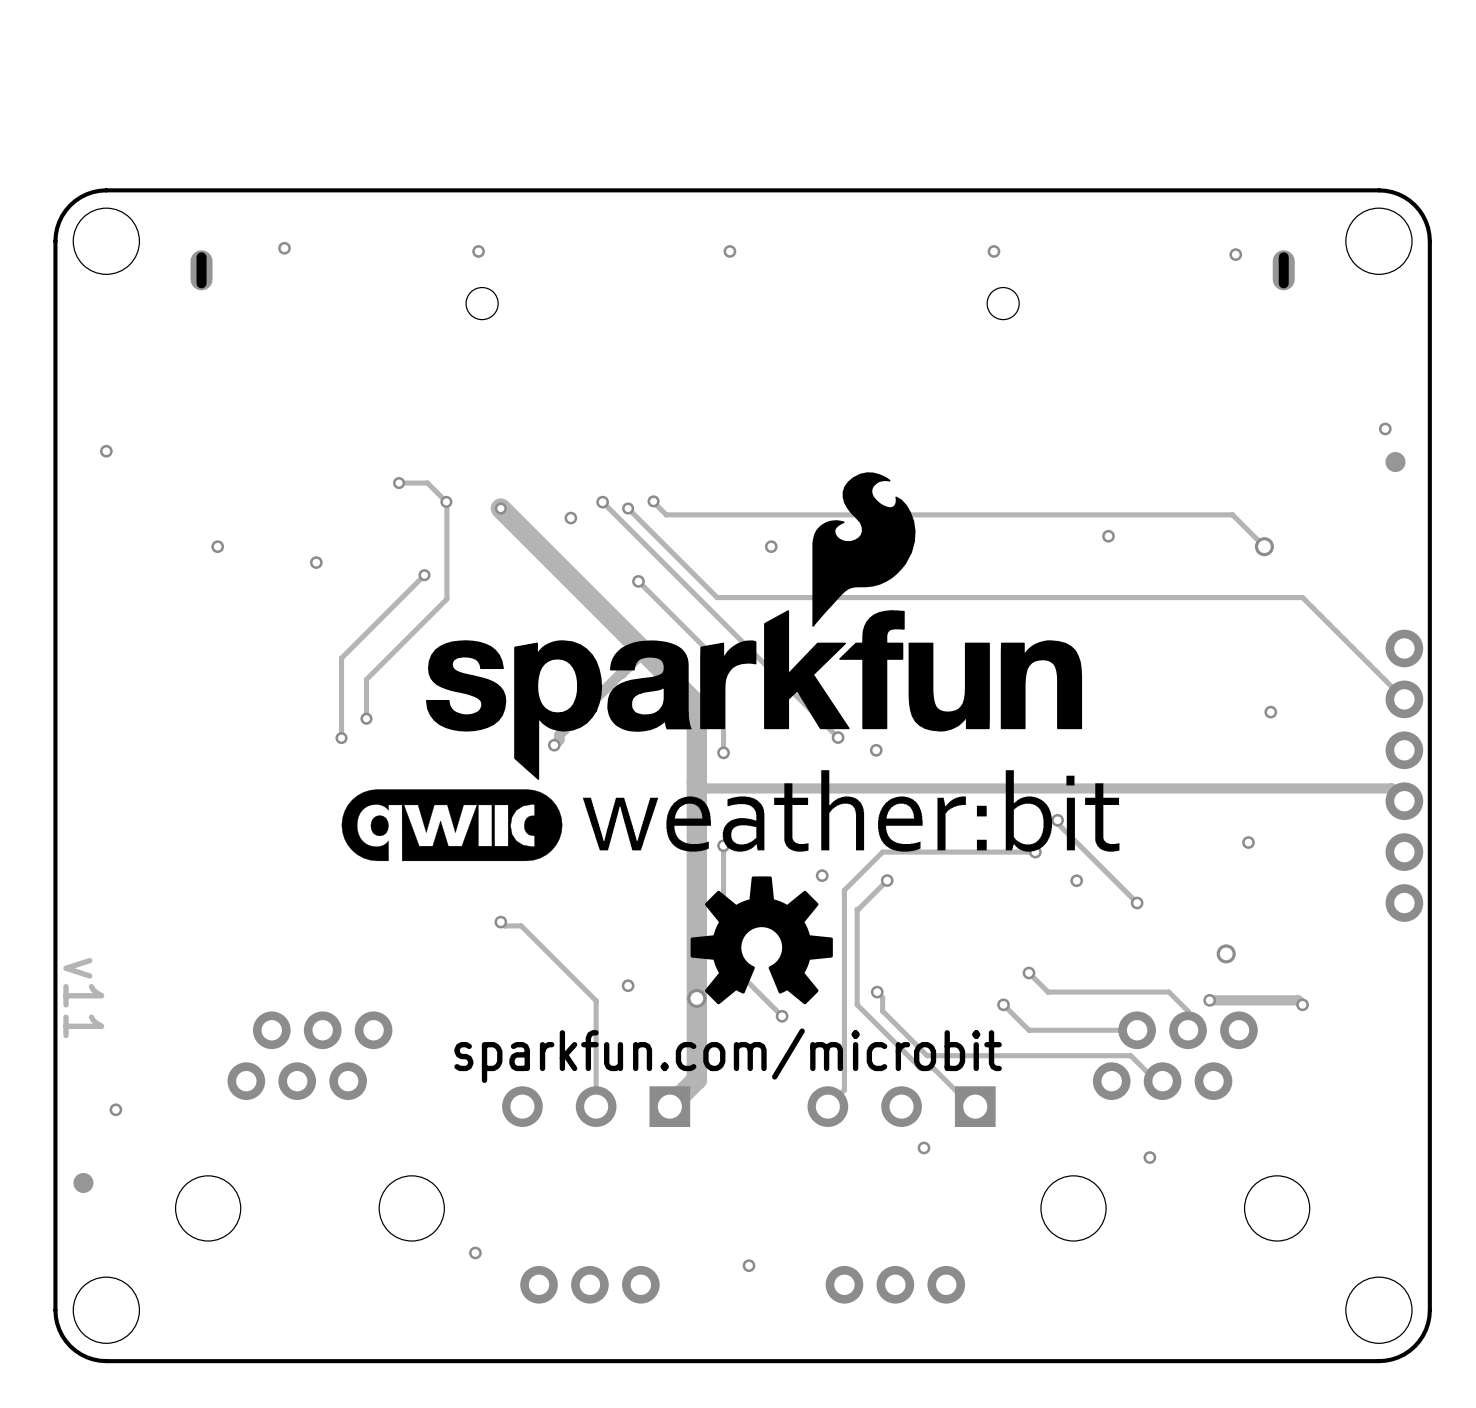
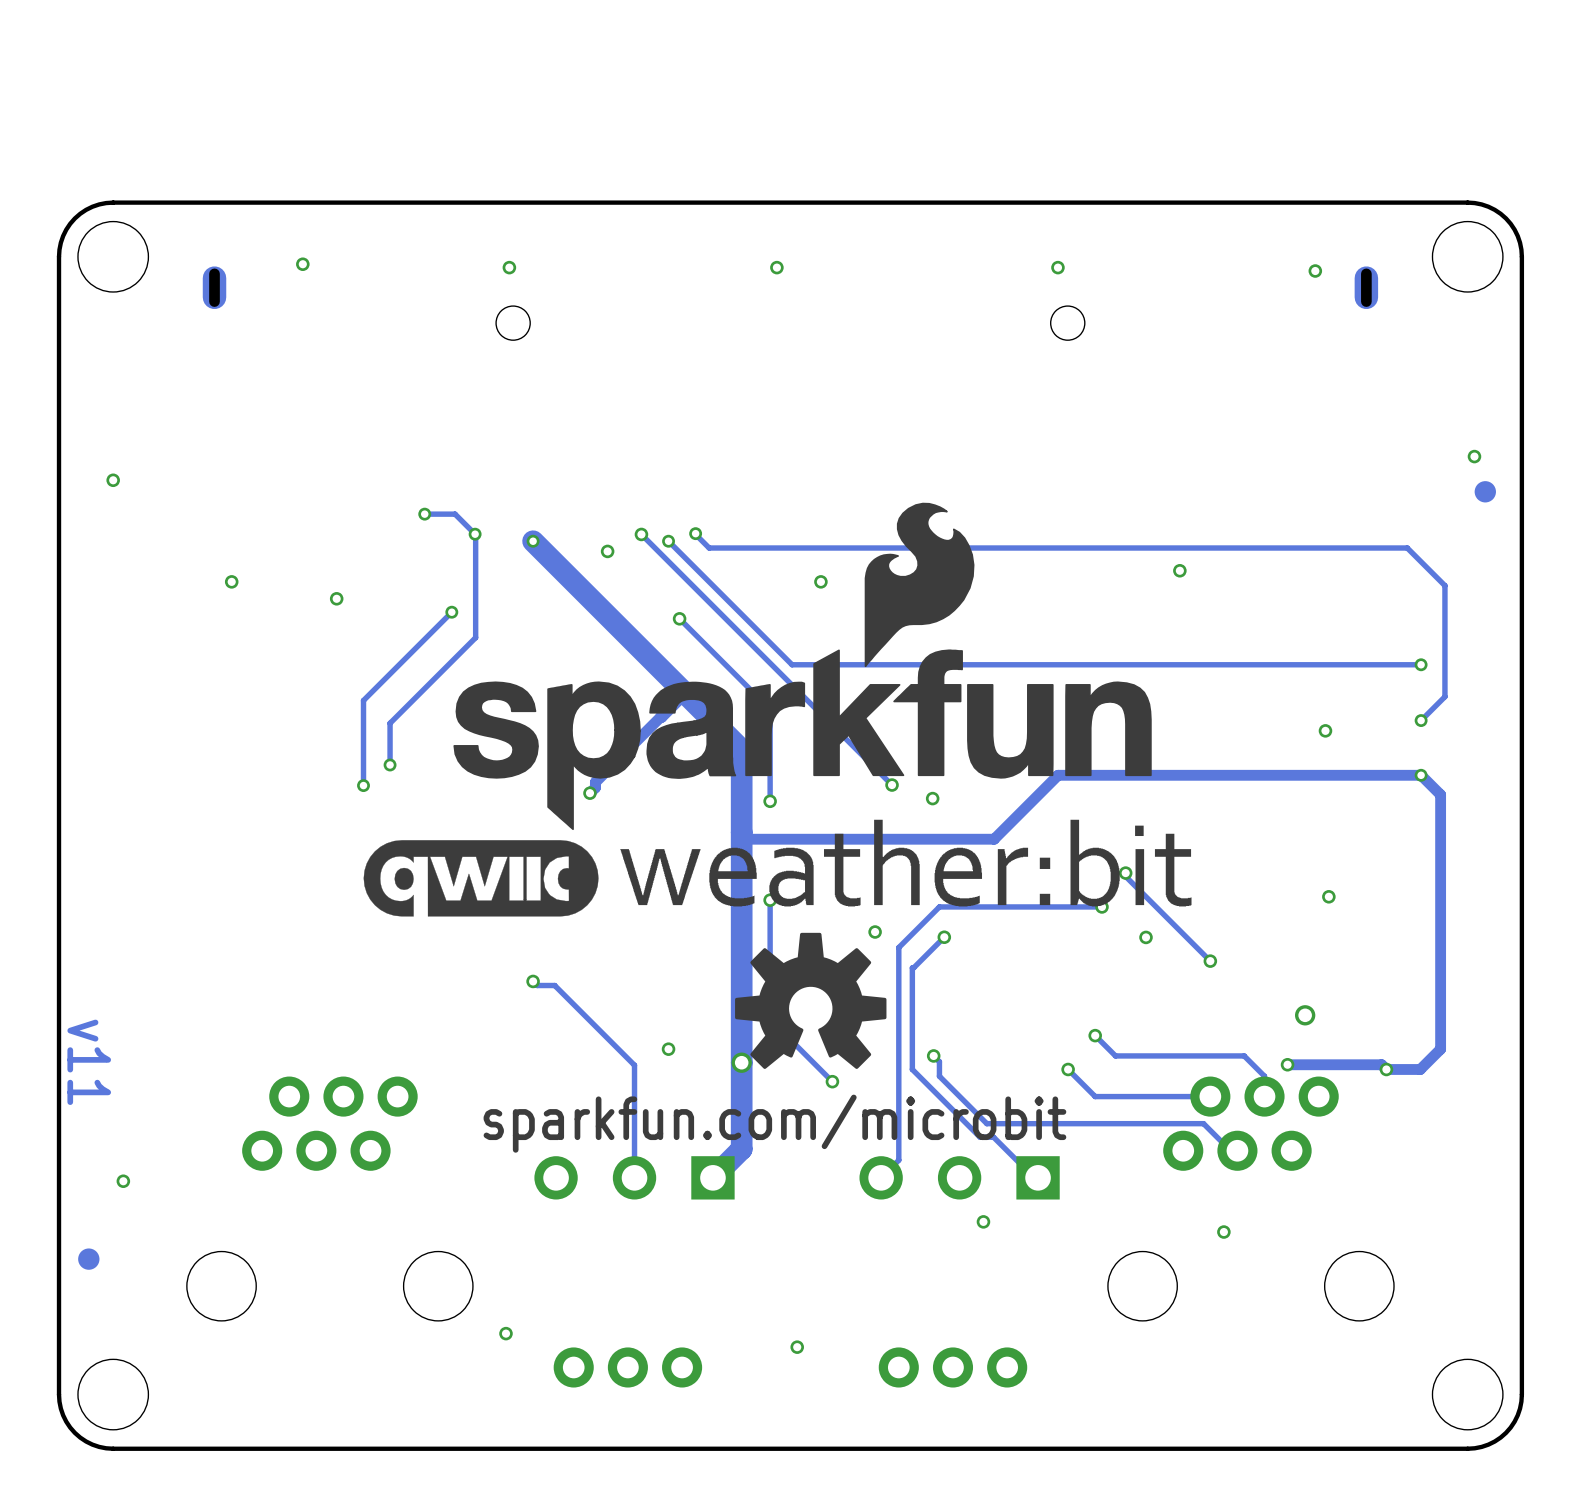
track: (1232, 514) (1264, 546) -> (1311, 548) (1407, 548) (1444, 585) (1444, 696) (1421, 720)
via: (1264, 546) -> none
track: (717, 597) (1302, 597) (1404, 699) -> (763, 636) (792, 664) (1421, 664)
via: none -> (1421, 664)
via: none -> (1421, 720)
via position: (1270, 712) -> (1325, 730)
via: none -> (1421, 775)
part: (1404, 775) -> none
track: (934, 788) (1391, 788) (1404, 801) -> (994, 839) (1058, 775) (1421, 775) (1440, 794) (1440, 1049) (1420, 1069) (1386, 1069)

